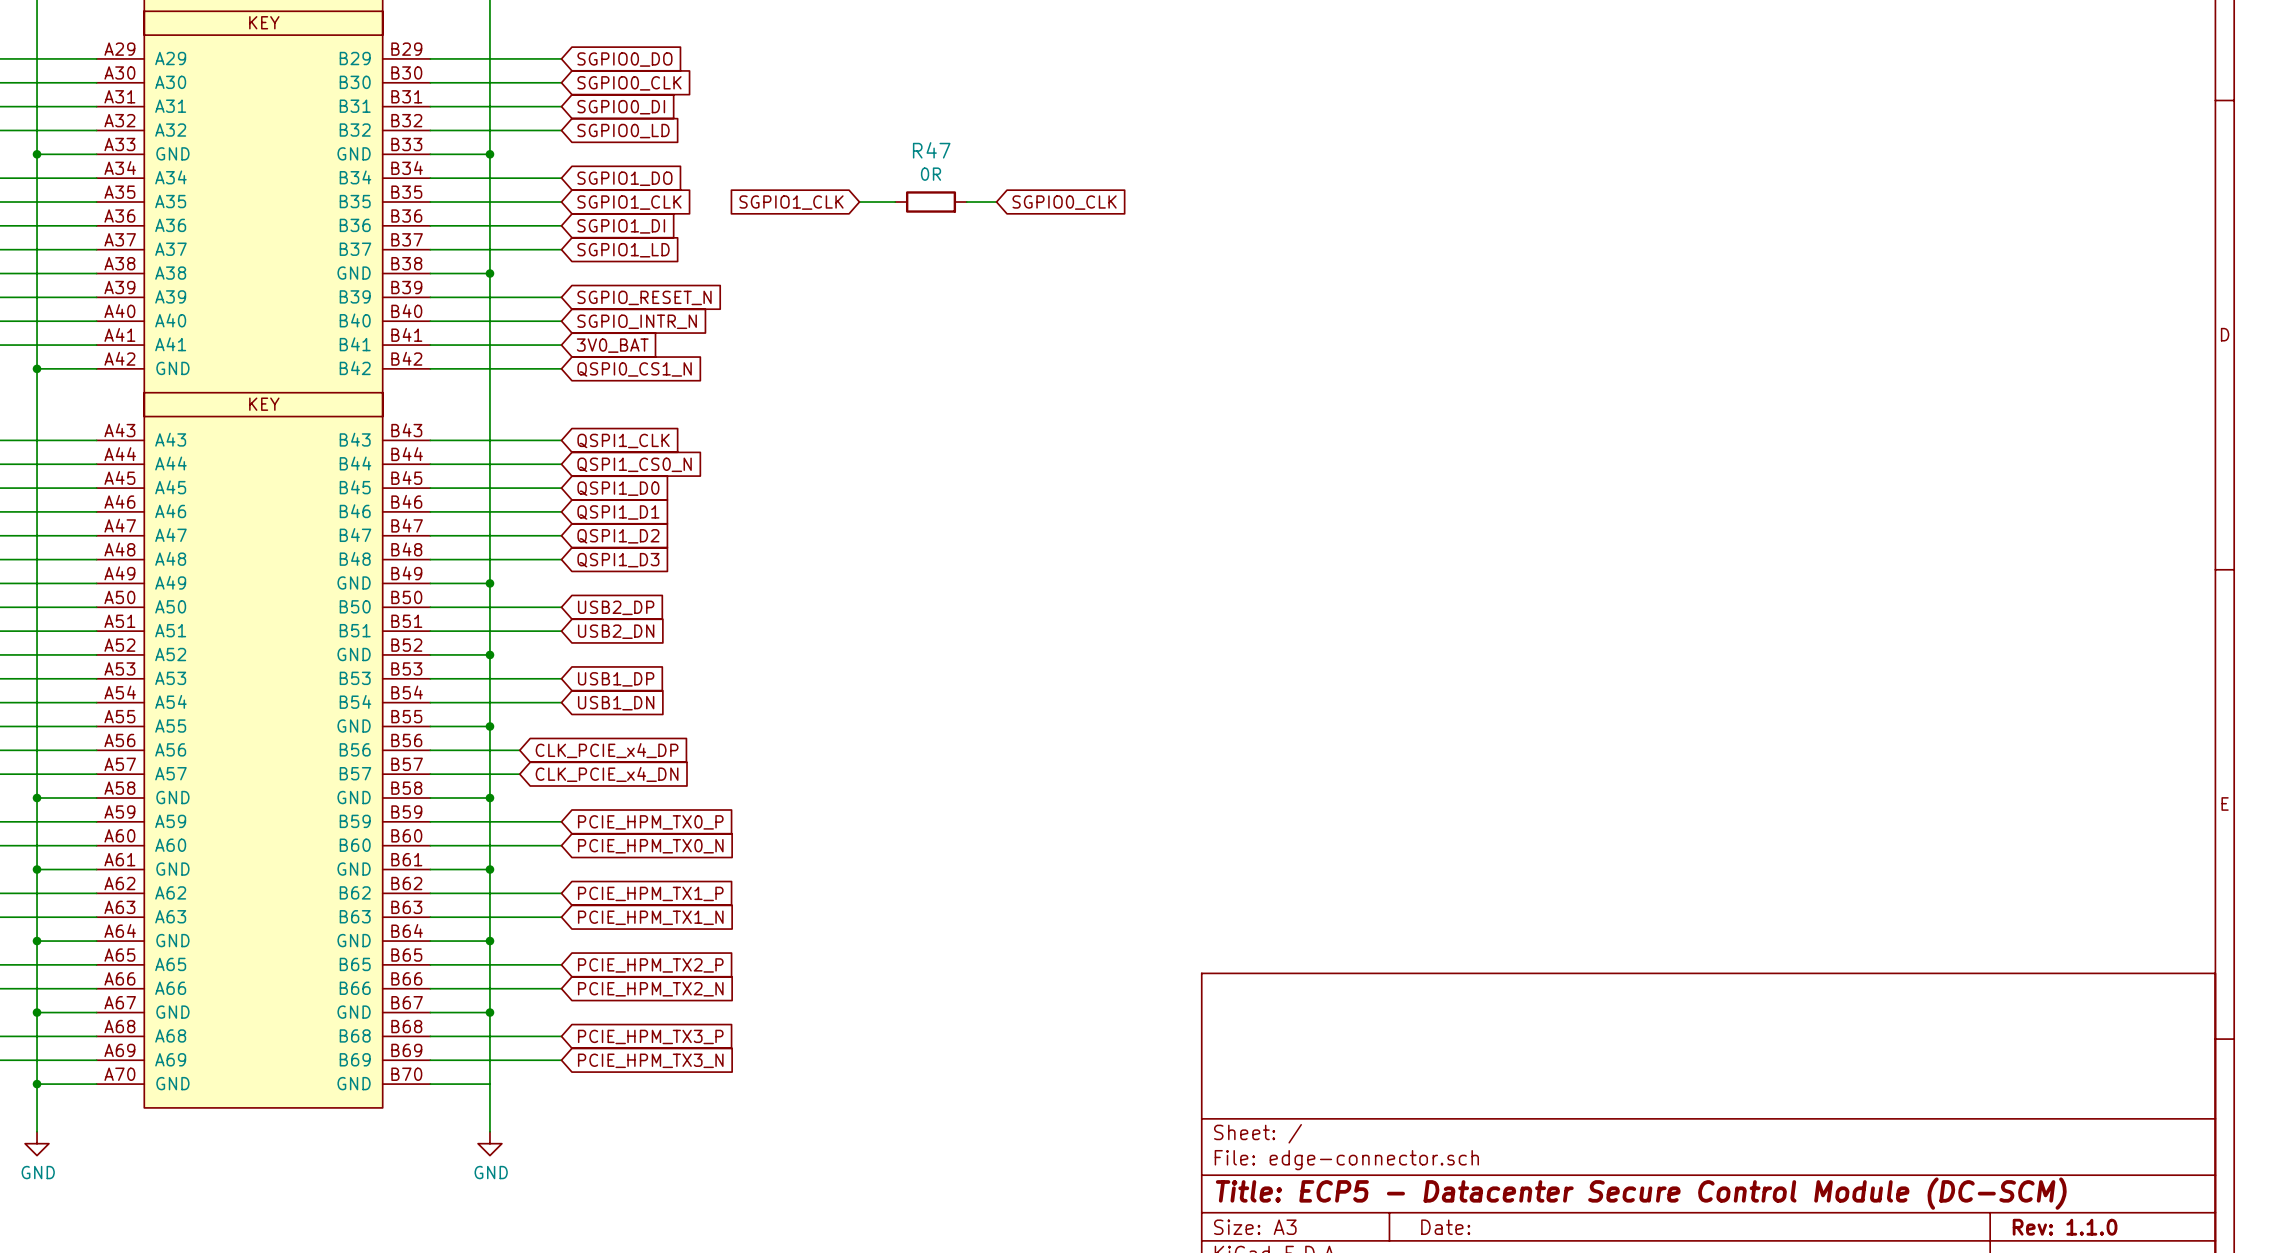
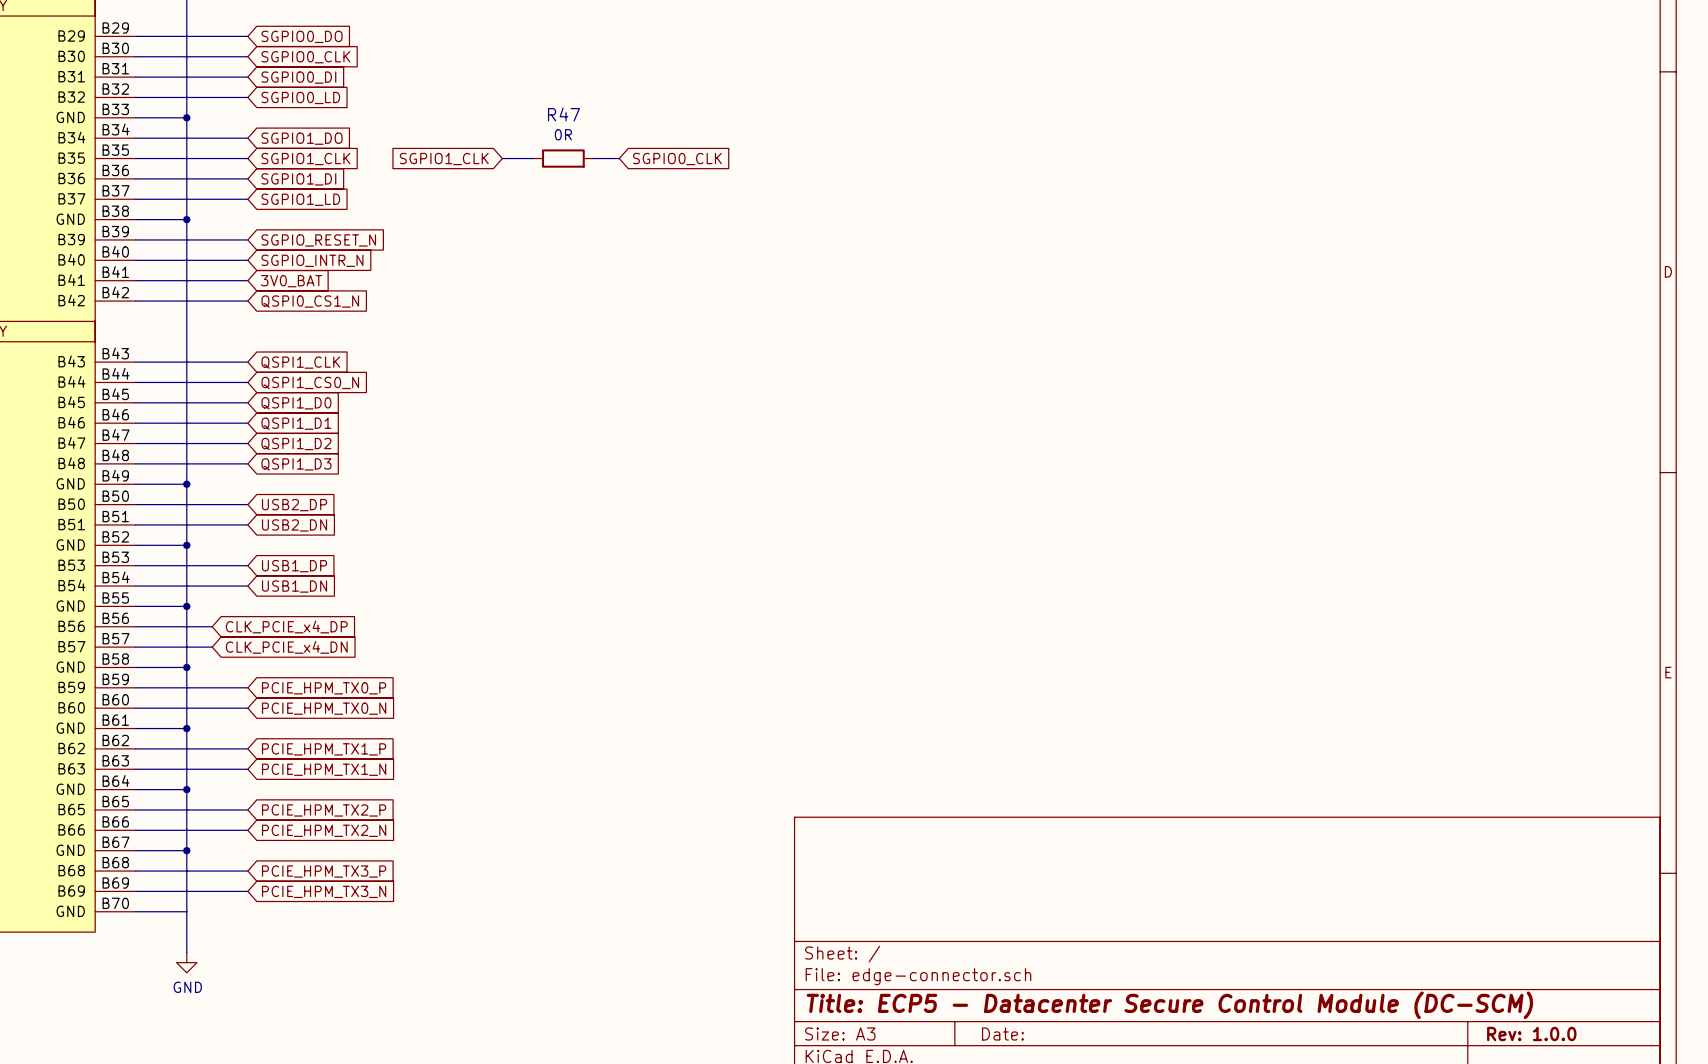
title block: Rev: 1.1.0 (2065, 1227) -> Rev: 1.0.0 (1531, 1033)

